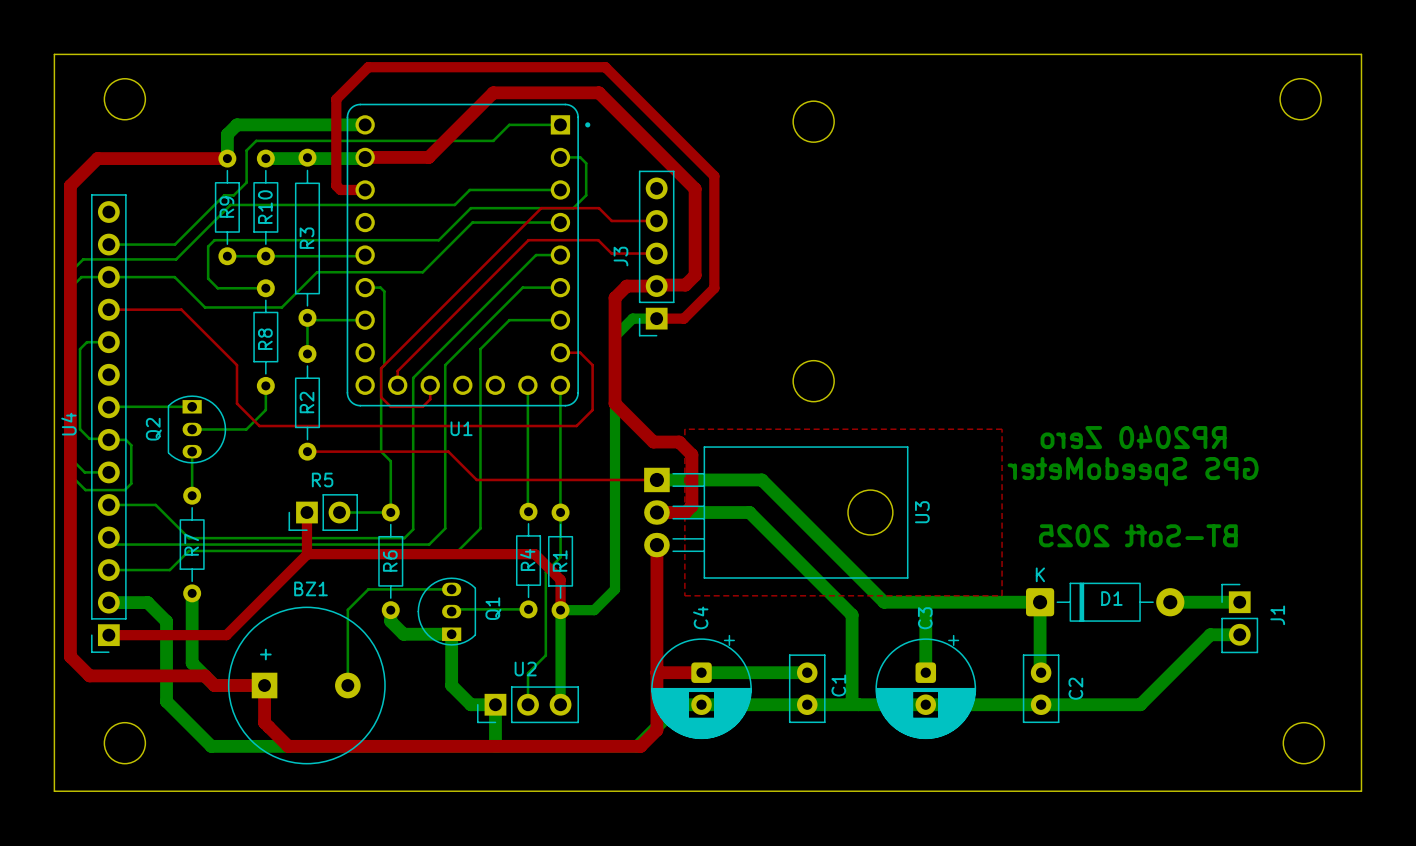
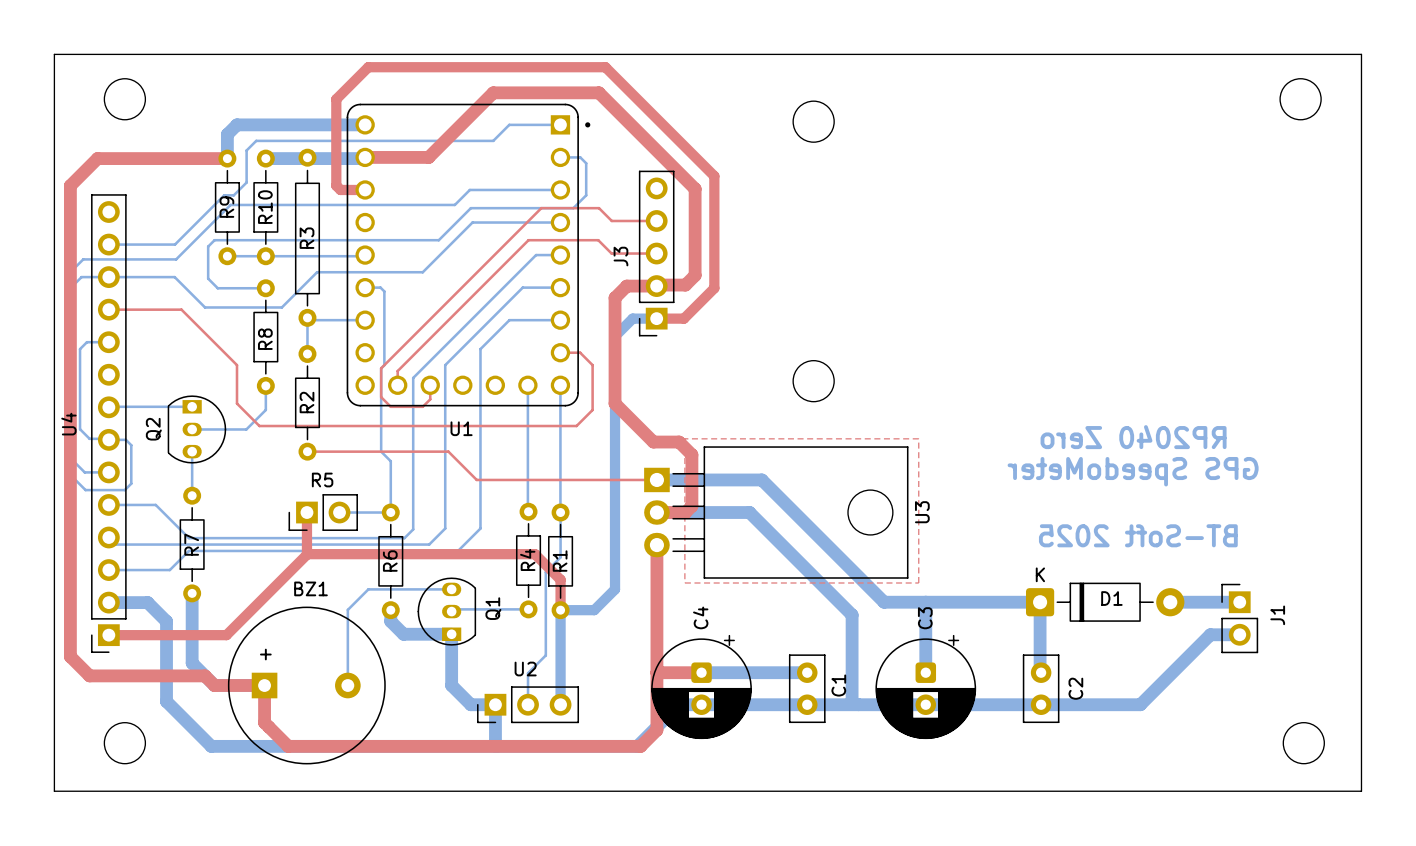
top zone outline: (684, 438) (684, 429) (1002, 429) (1002, 595) (684, 595) (684, 582) -> (684, 438) (918, 438) (918, 582) (684, 582)

